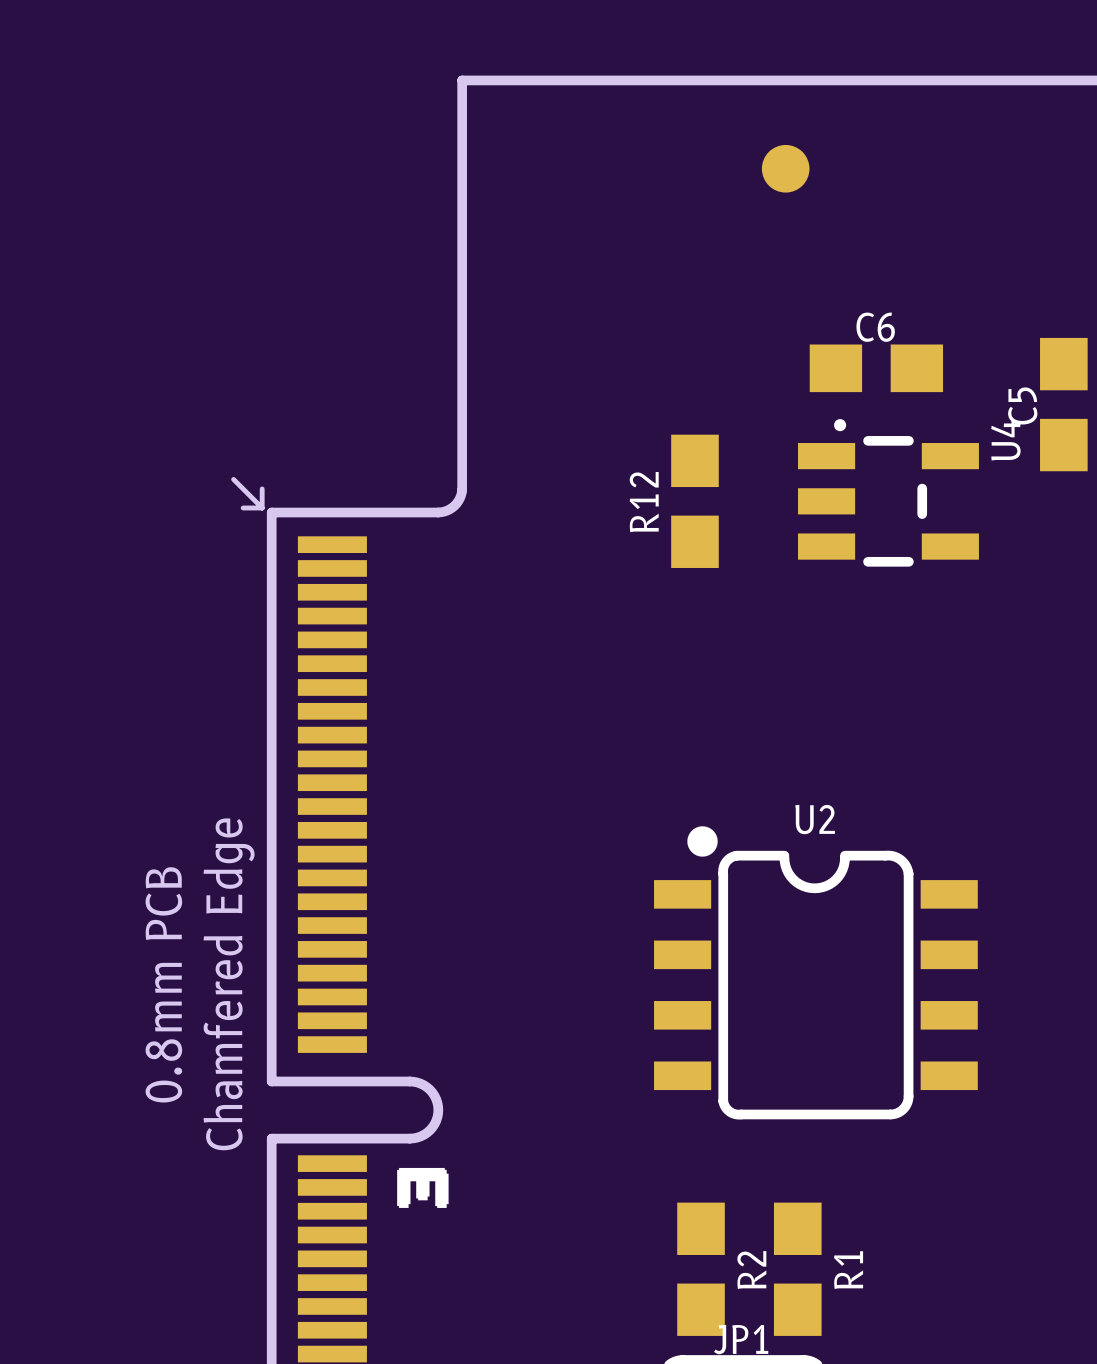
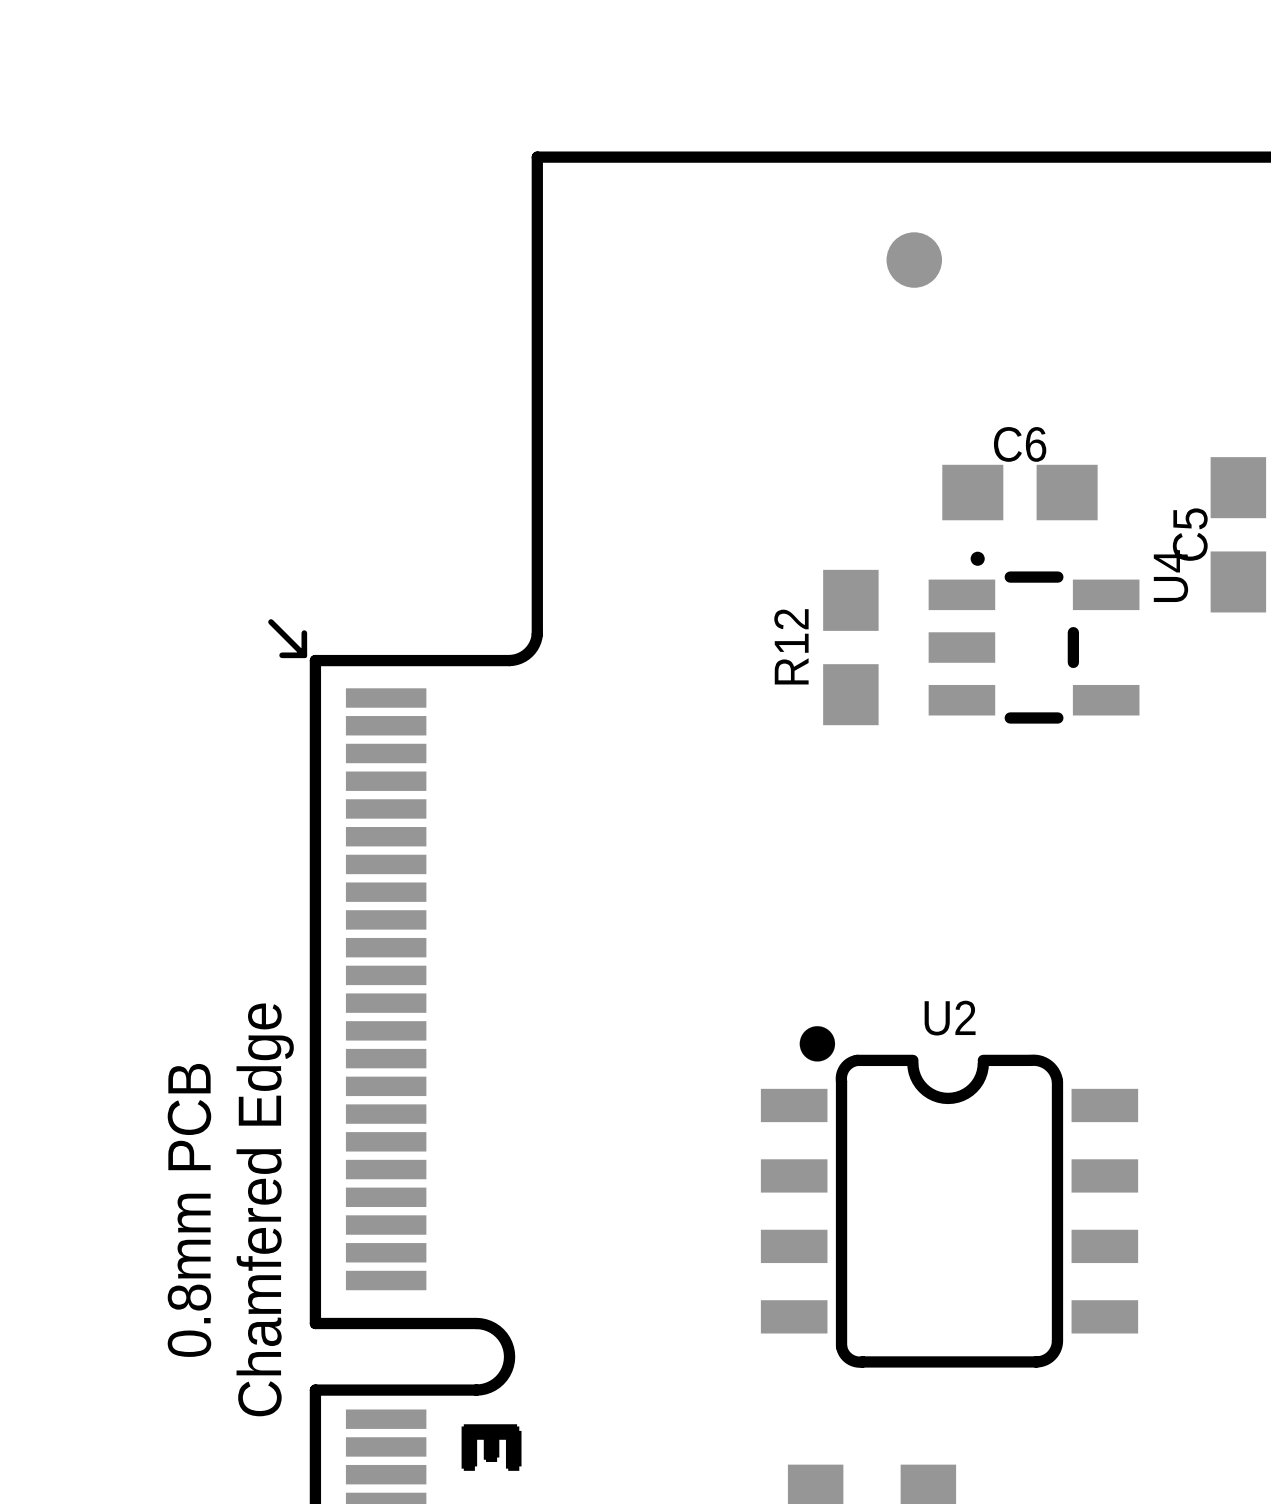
R12 position: (694, 501) -> (850, 647)

